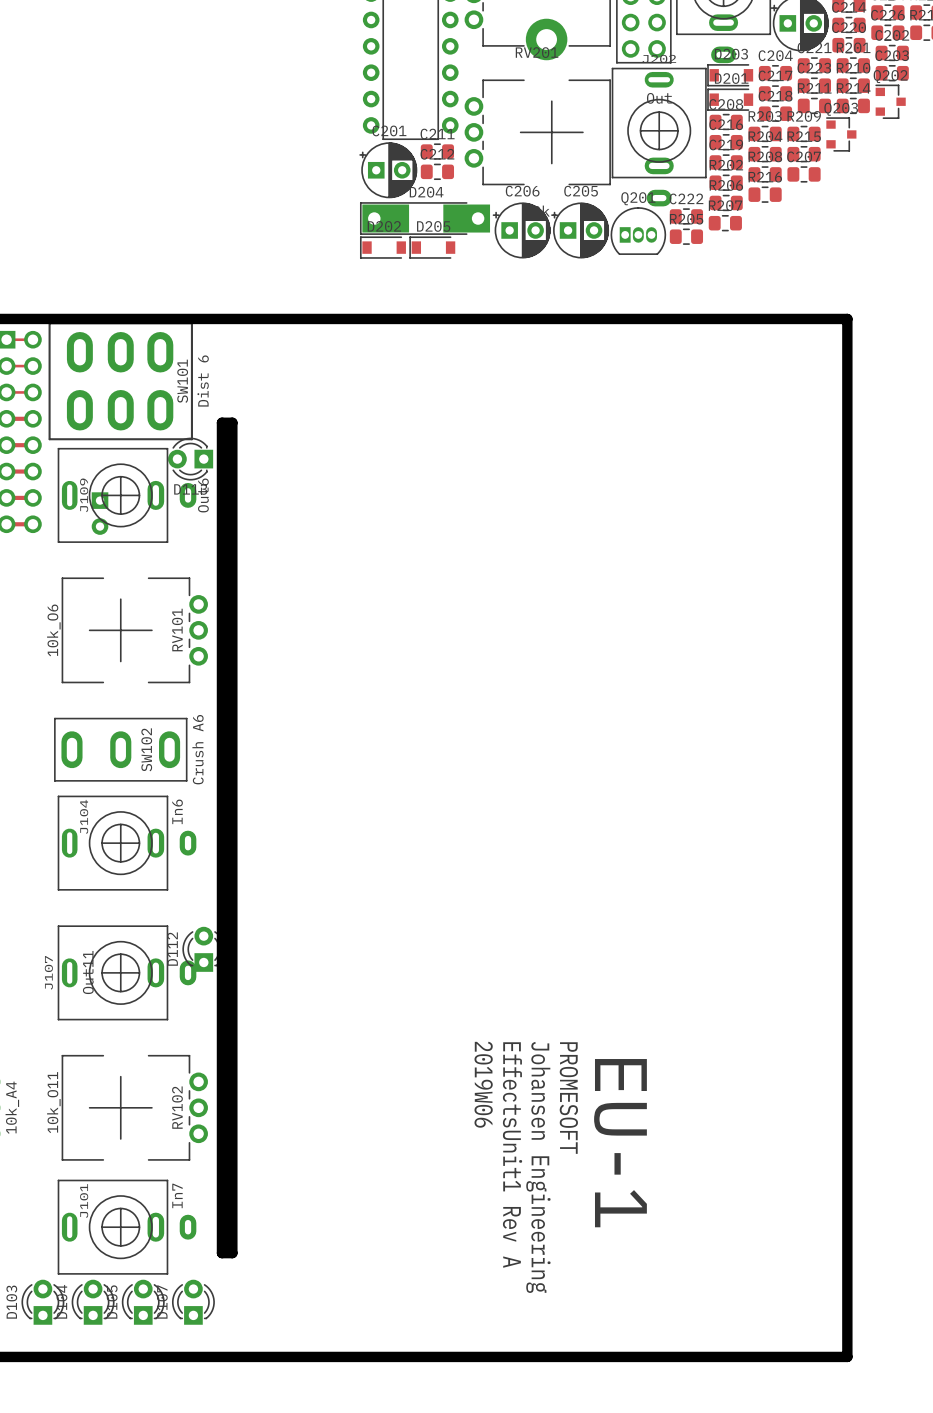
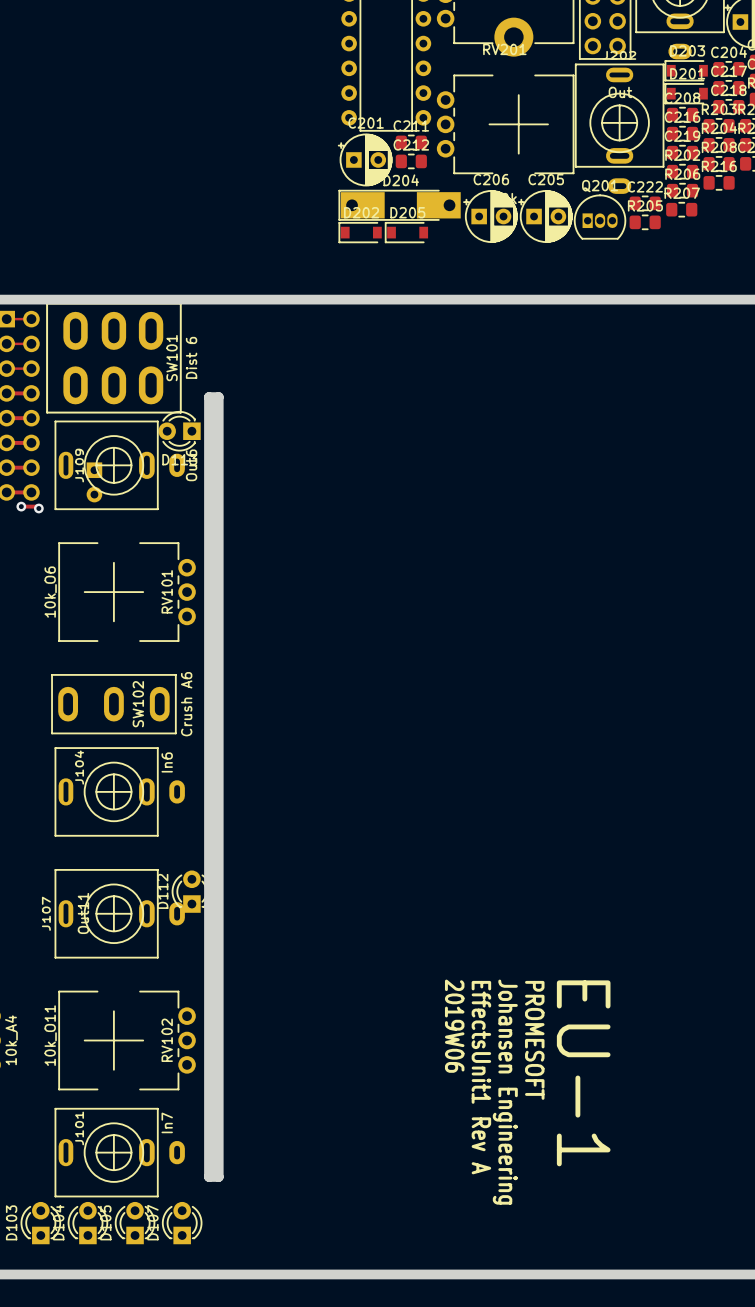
track: none -> (21, 506) (36, 506) (38, 508)
via: none -> (21, 506)
via: none -> (38, 508)

